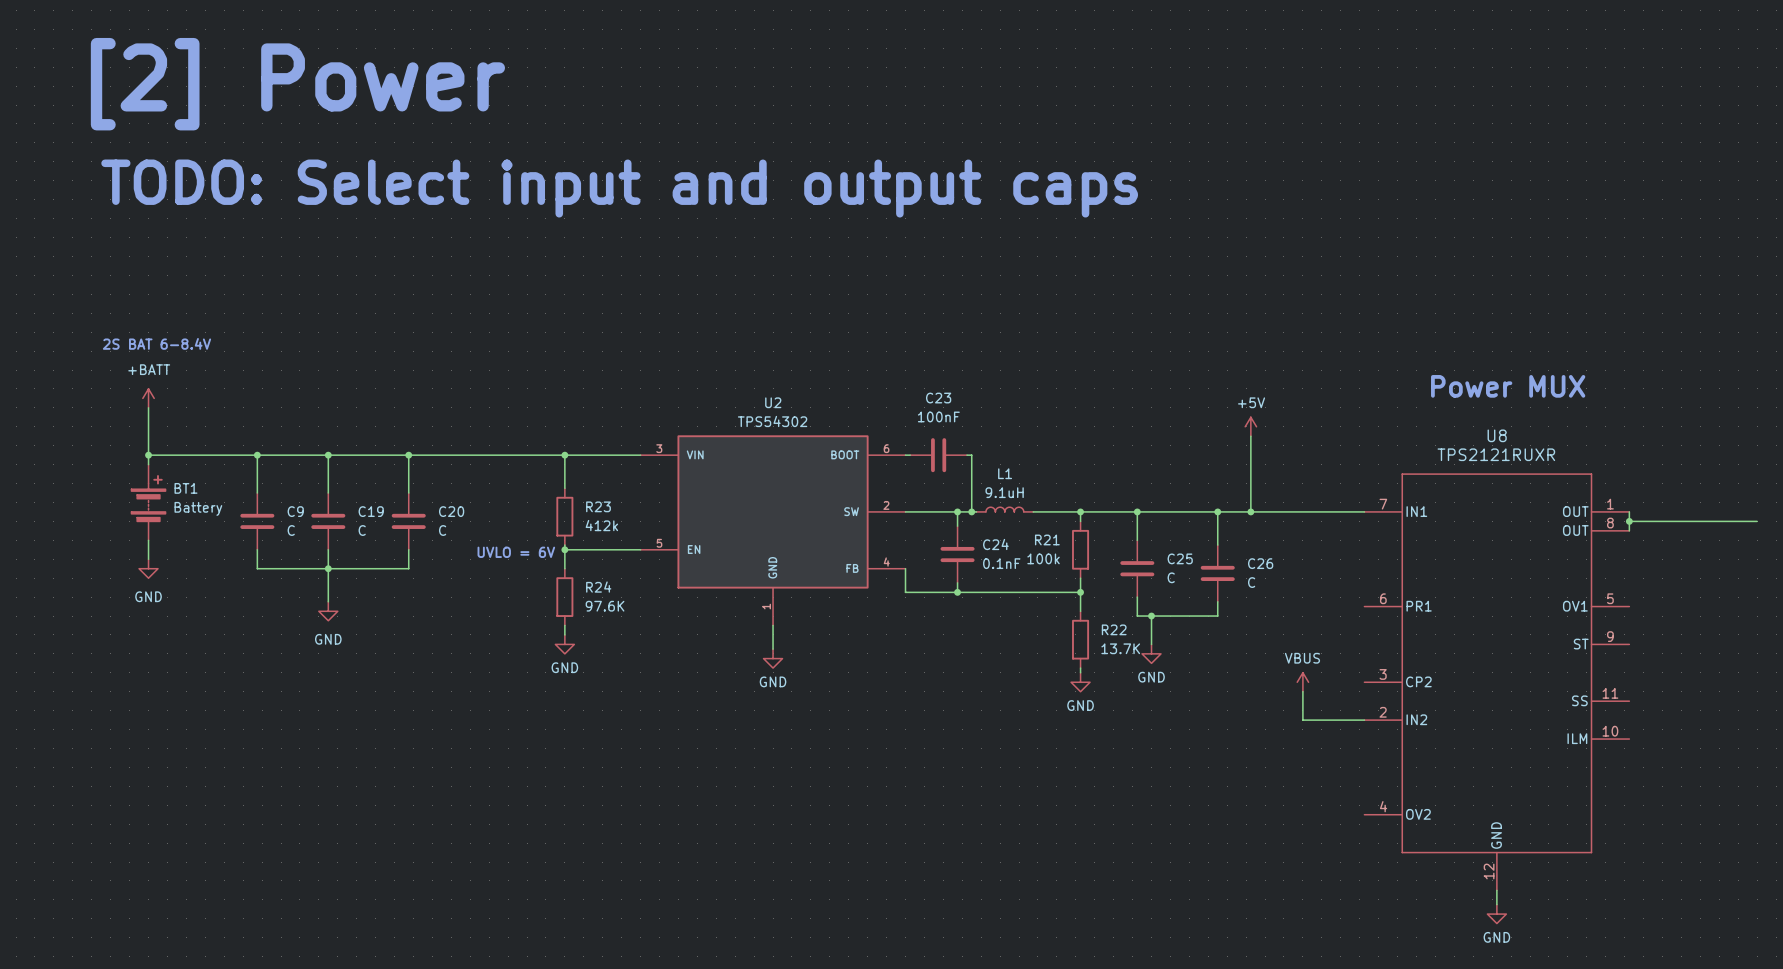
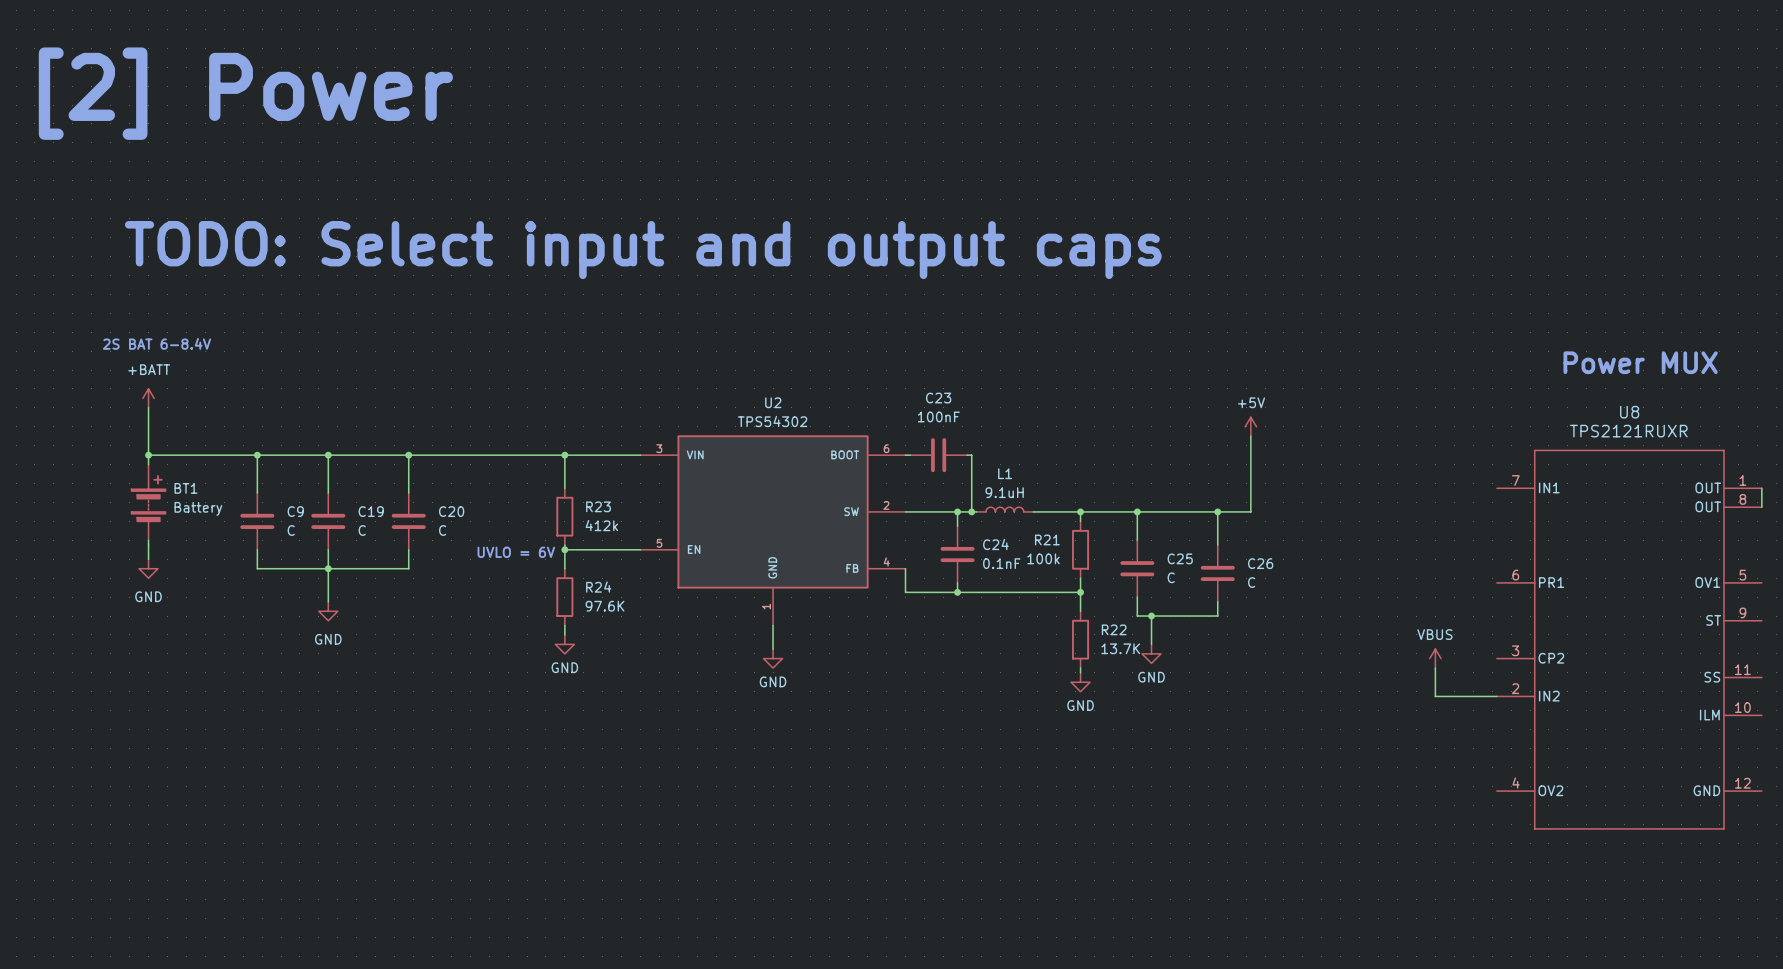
text position: [2] Power (297, 84) -> [2] Power (245, 93)
text position: TODO: Select input and output caps (619, 188) -> TODO: Select input and output caps (643, 250)
text position: Power MUX (1508, 386) -> Power MUX (1640, 362)
U8 name position: U8 (1497, 435) -> U8 (1629, 412)
U8 value position: TPS2121RUXR (1496, 454) -> TPS2121RUXR (1628, 431)
U8 symbol: [1364, 473, 1630, 891] -> [1496, 449, 1762, 830]
wire: (1250, 511) (1364, 511) -> none
junction: (1250, 511) -> none
wire: (1629, 511) (1629, 530) -> (1761, 488) (1761, 507)
wire: (1629, 521) (1757, 521) -> none
junction: (1629, 521) -> none
power symbol position: VBUS (1302, 682) -> VBUS (1435, 658)
wire: (1302, 691) (1302, 720) (1364, 720) -> (1435, 668) (1435, 696) (1496, 696)
wire: (1496, 890) (1496, 904) -> none
power symbol: GND (1496, 914) -> none

